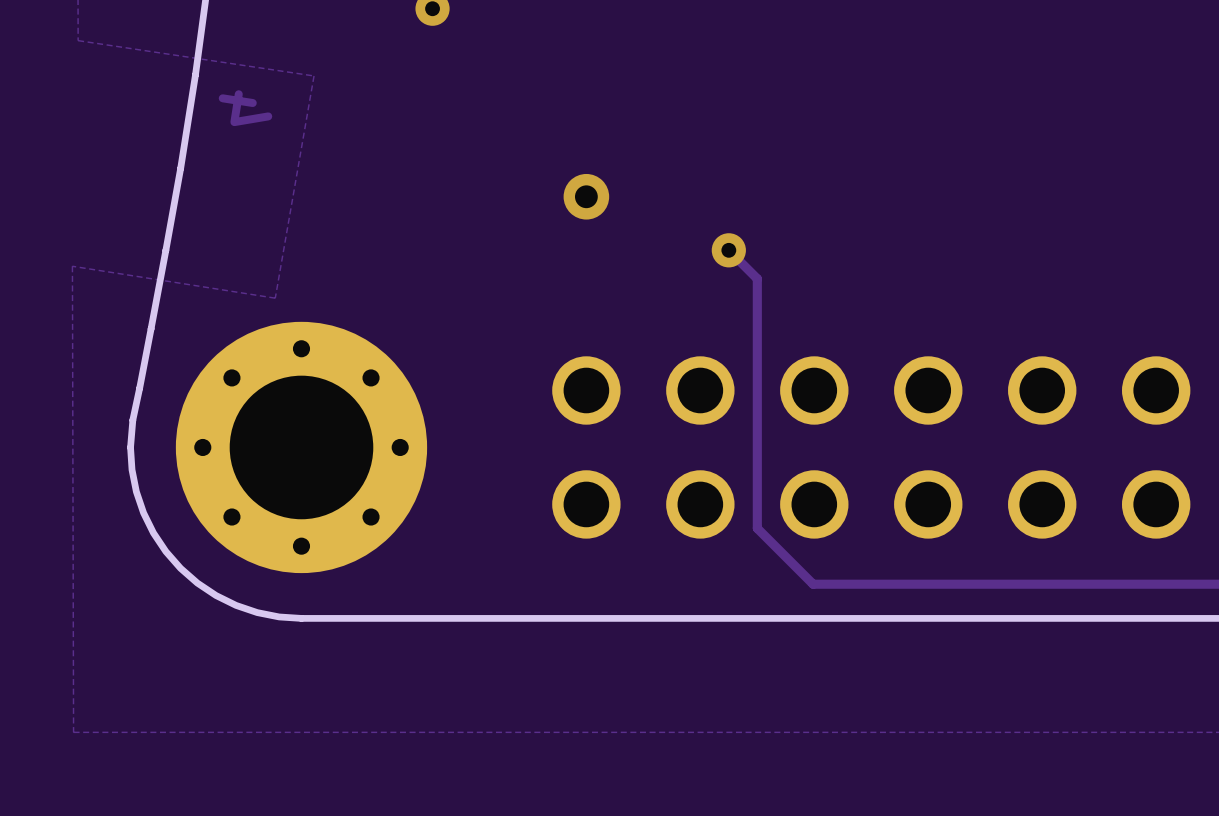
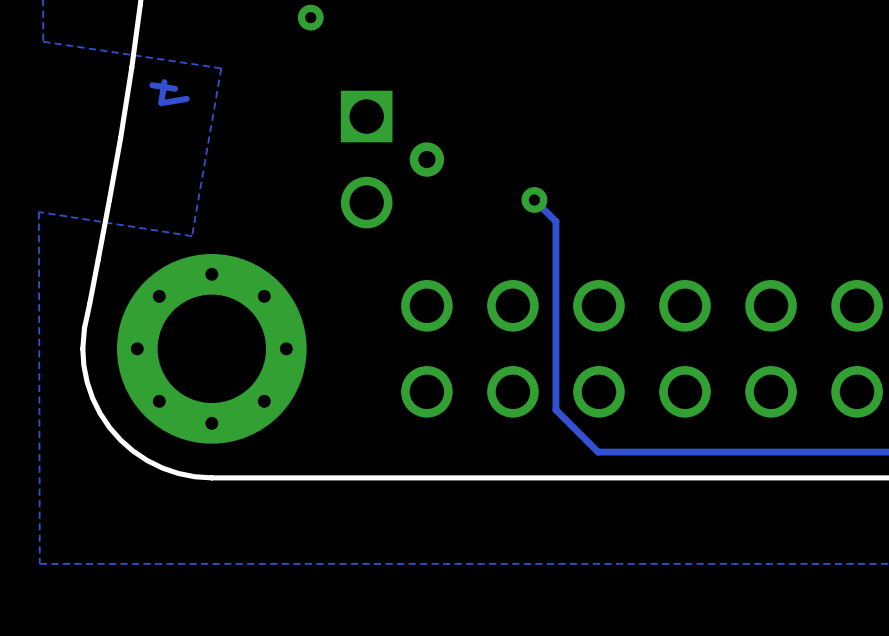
part: none -> (366, 159)

